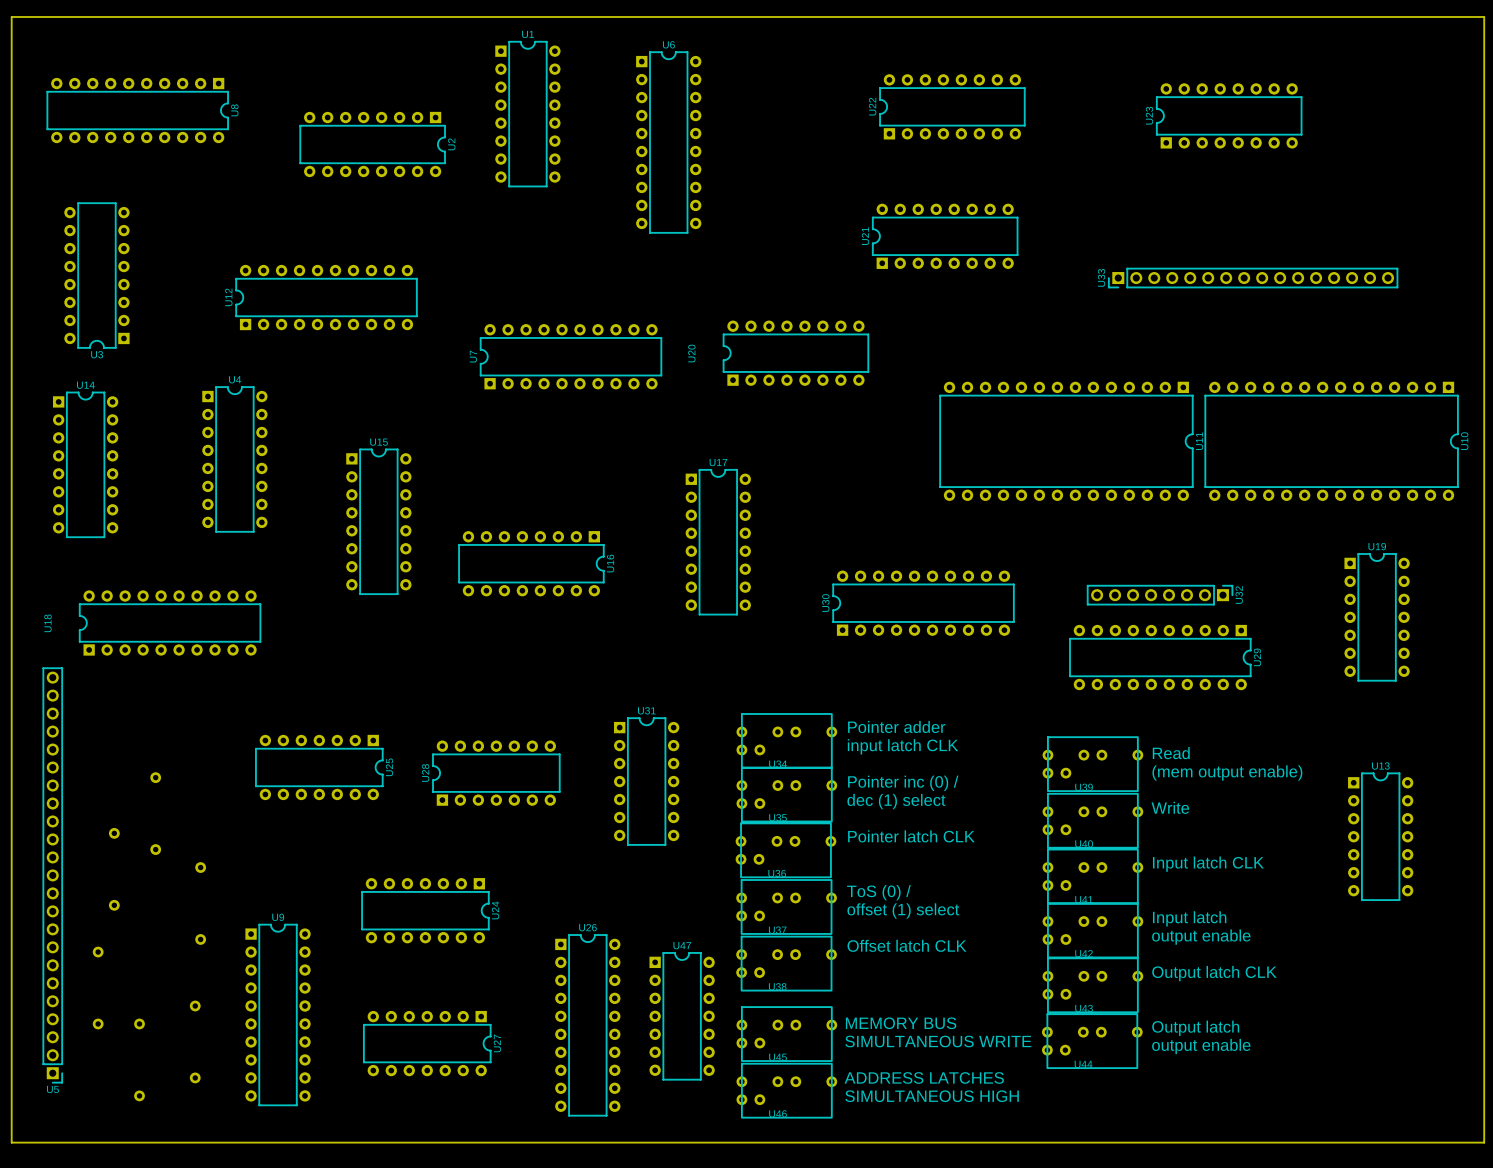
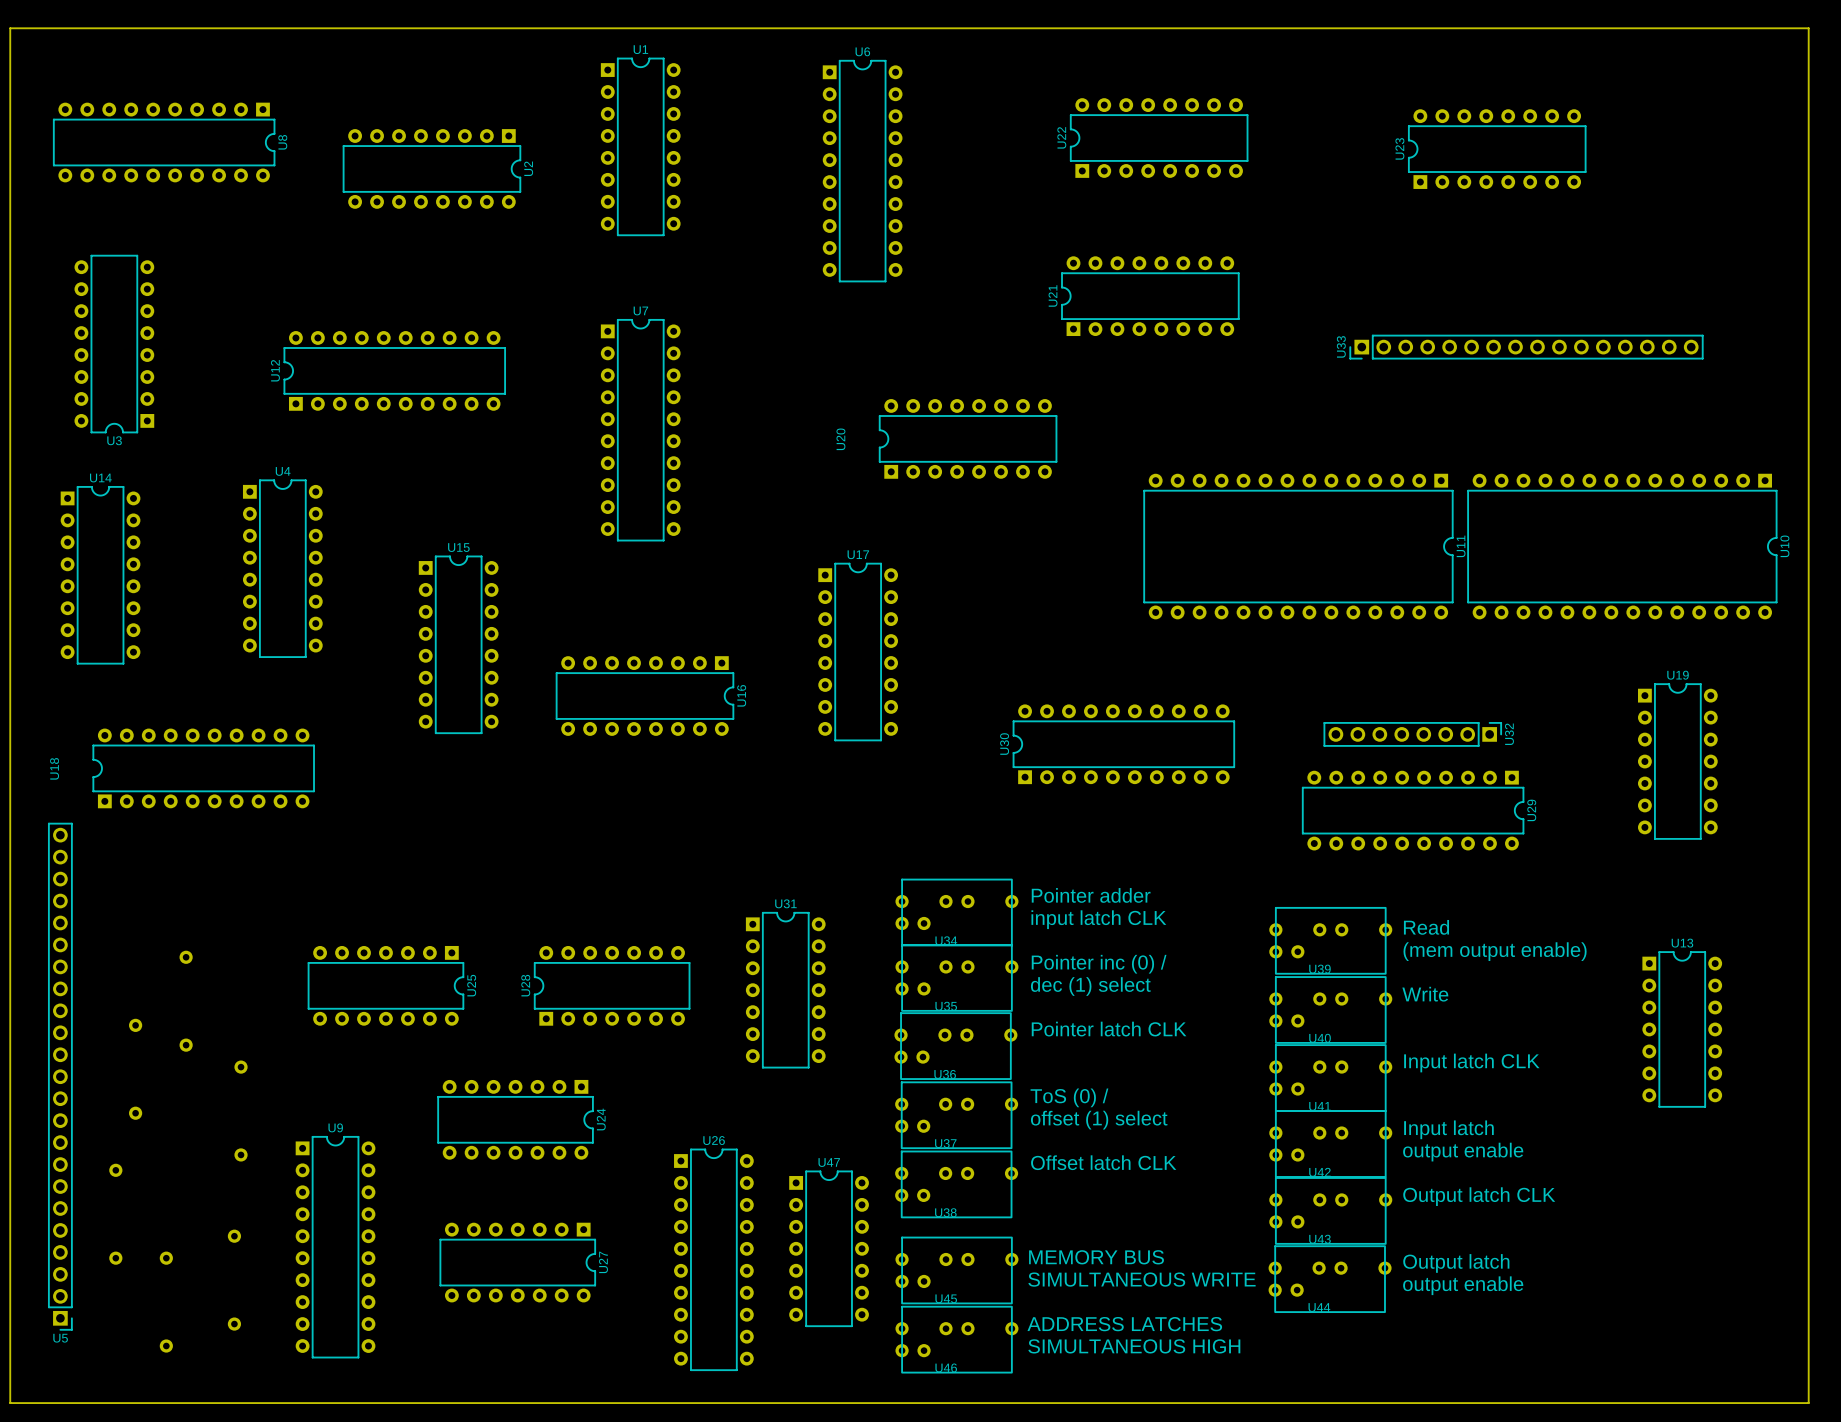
U6 position: (668, 142) -> (862, 171)
U2 position: (372, 144) -> (431, 168)
U7 rotation: 0° (571, 356) -> 90° clockwise (640, 430)
U17 position: (718, 542) -> (858, 652)
U25 position: (319, 767) -> (385, 985)
U28 position: (496, 773) -> (612, 985)
U31 position: (646, 781) -> (785, 990)
U27 position: (427, 1043) -> (517, 1262)

